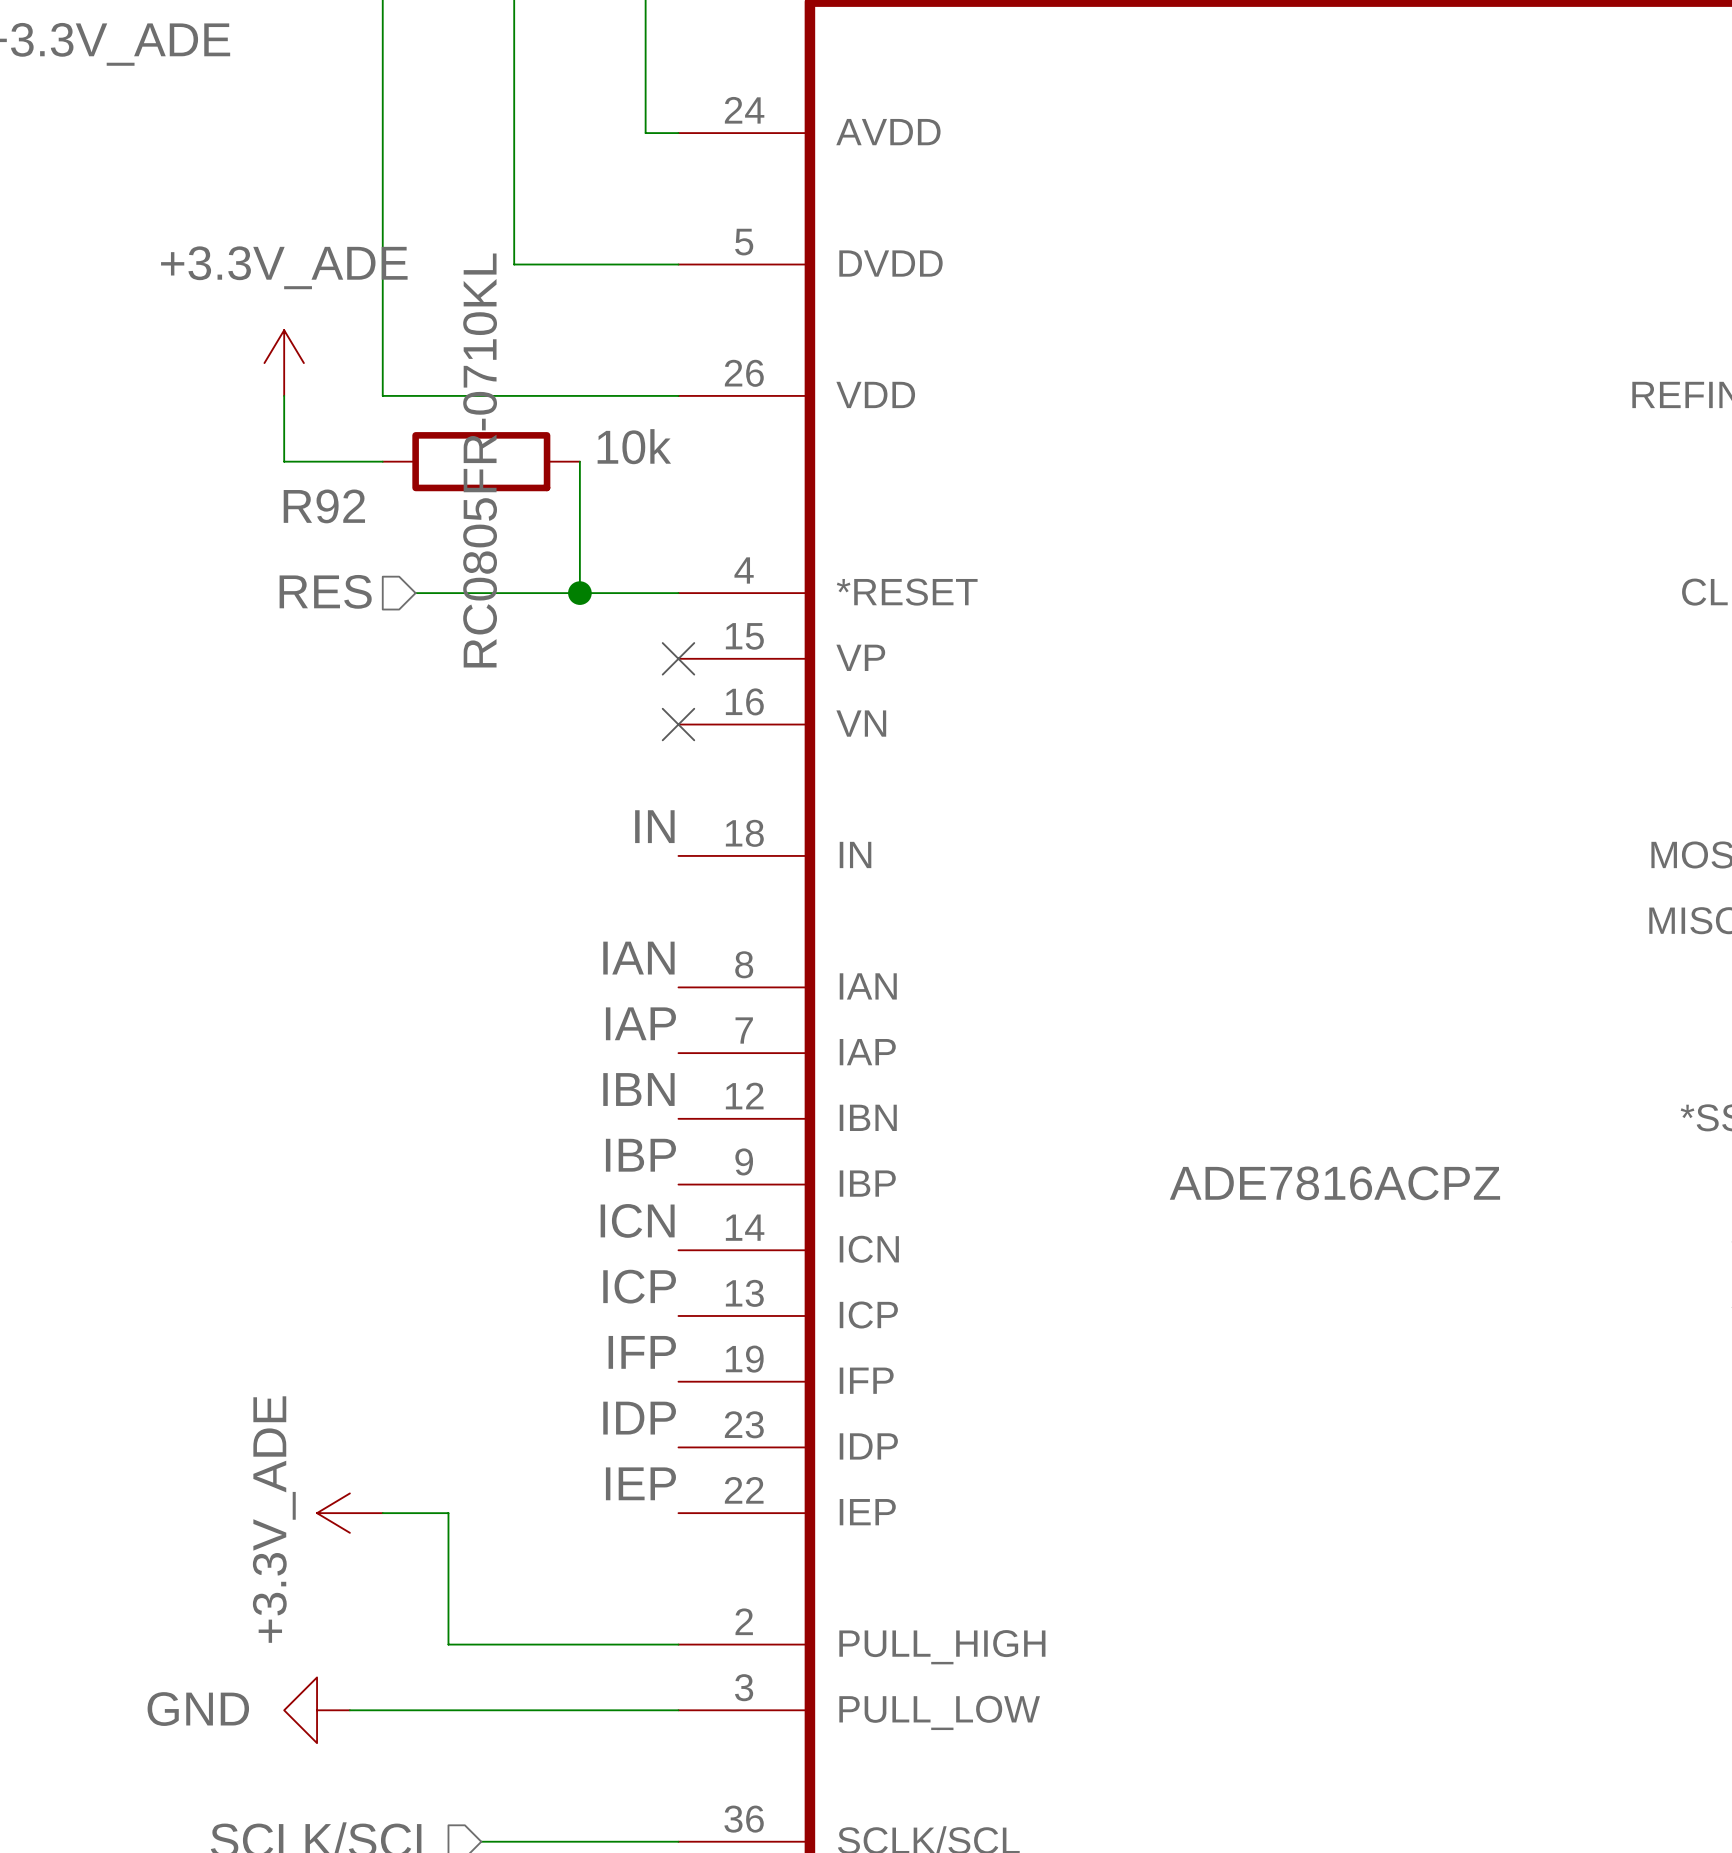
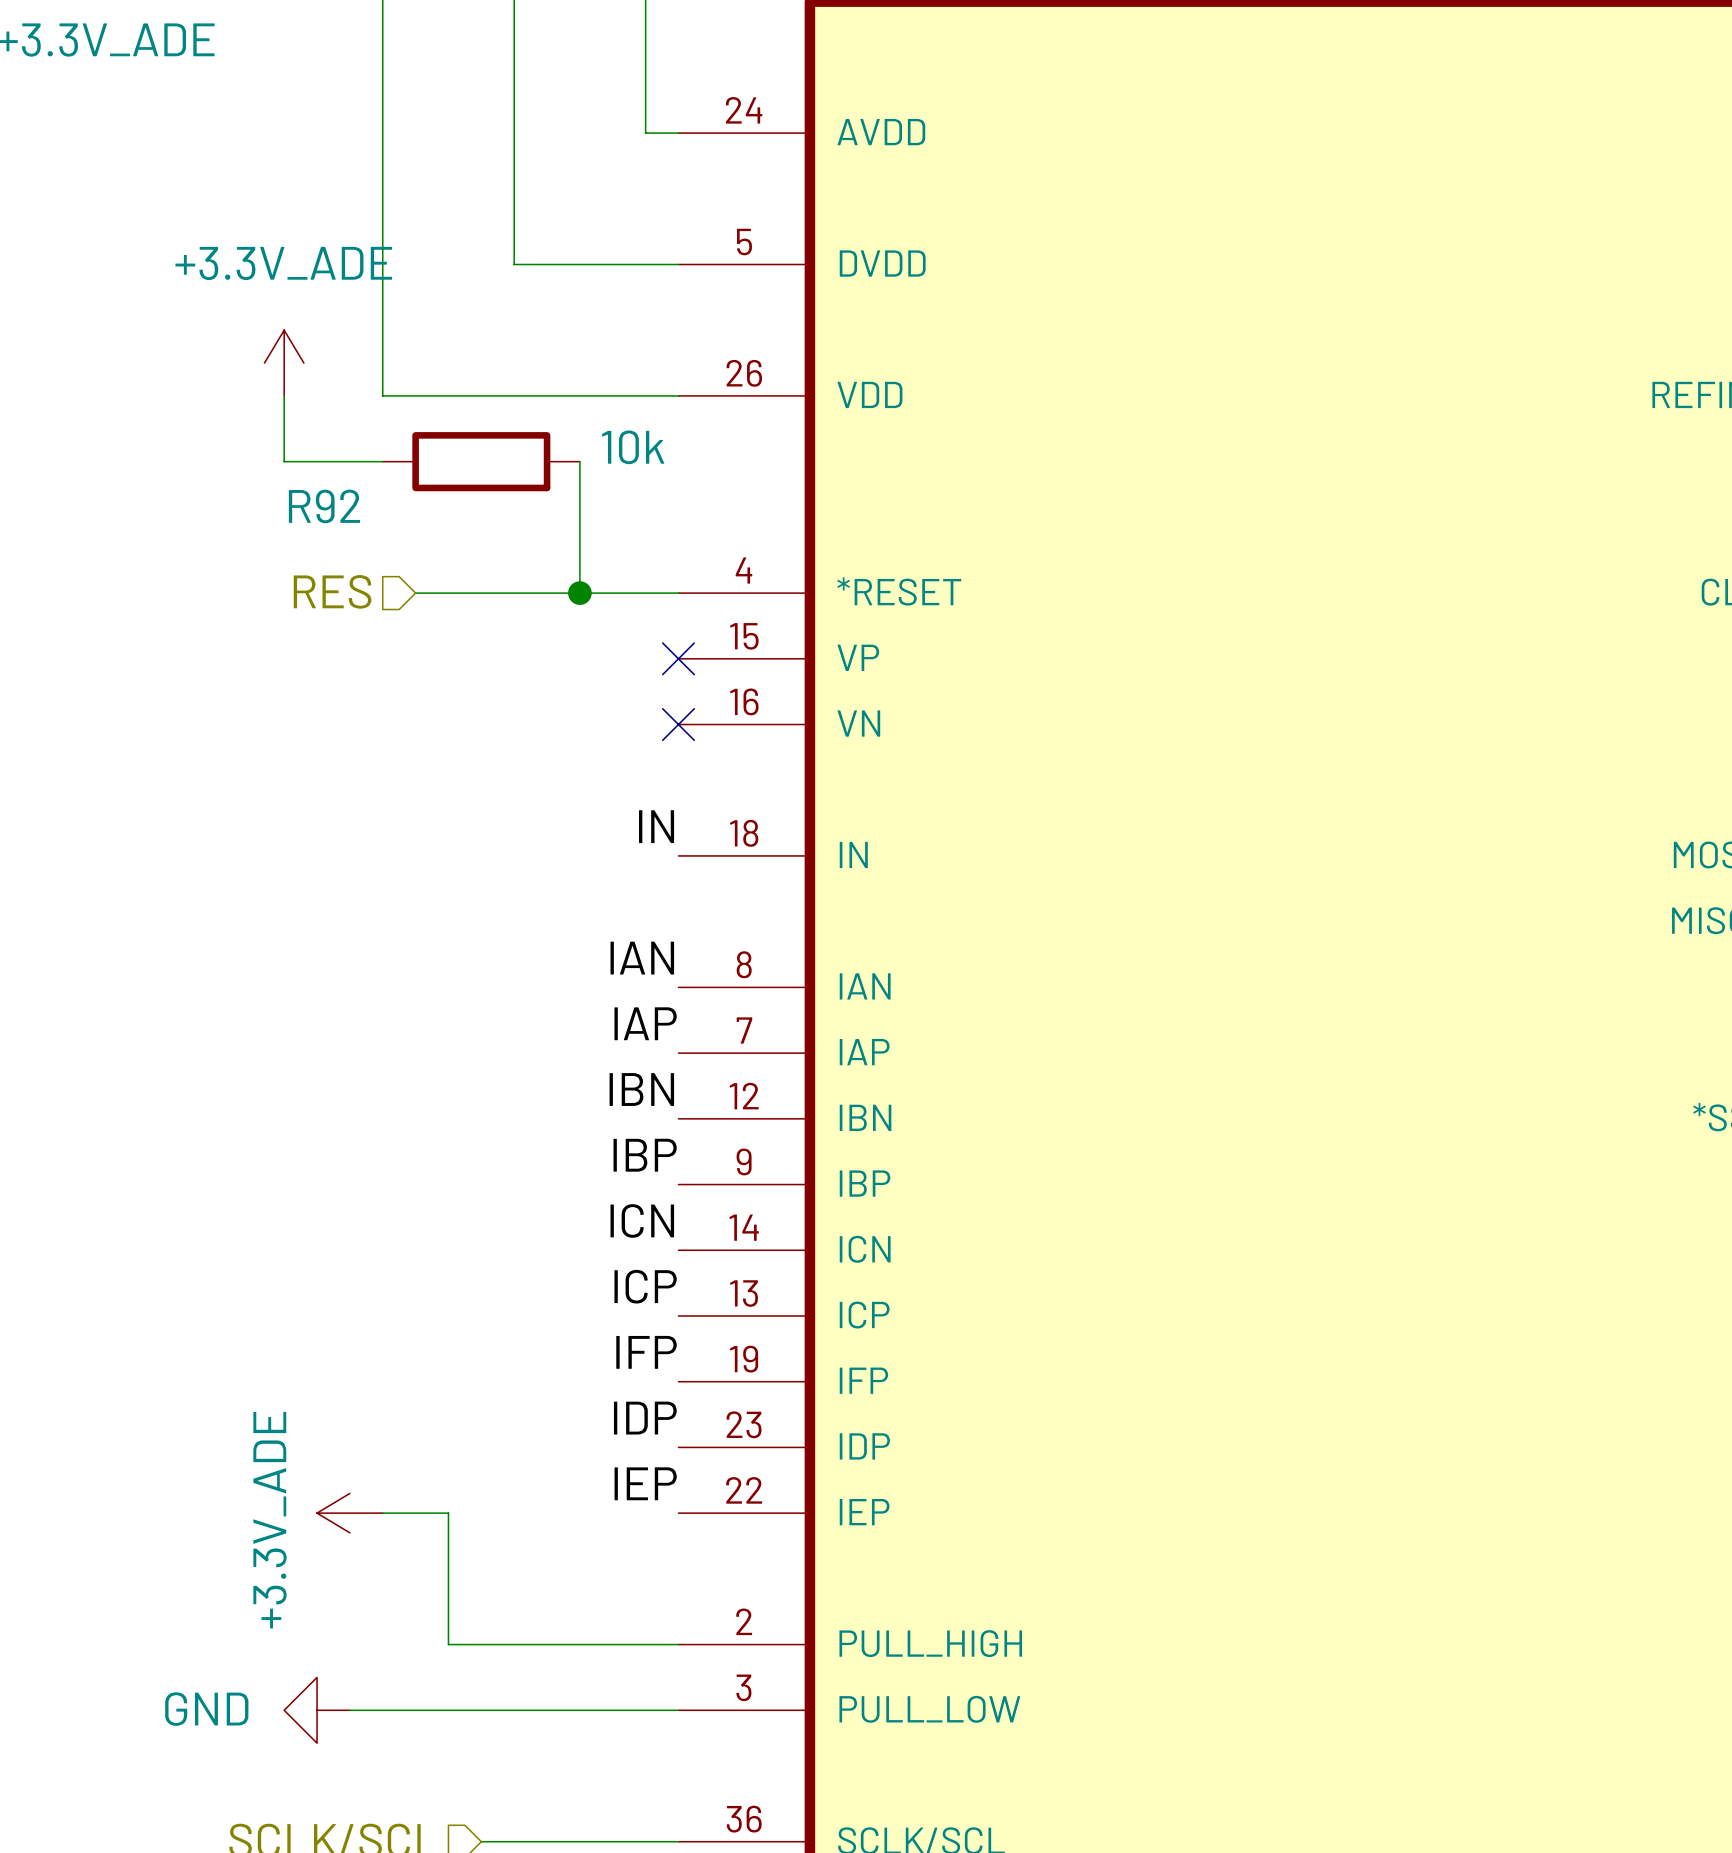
R92 text: RC0805FR-0710KL (480, 460) -> none
part text: ADE7816ACPZ (1334, 1183) -> none

